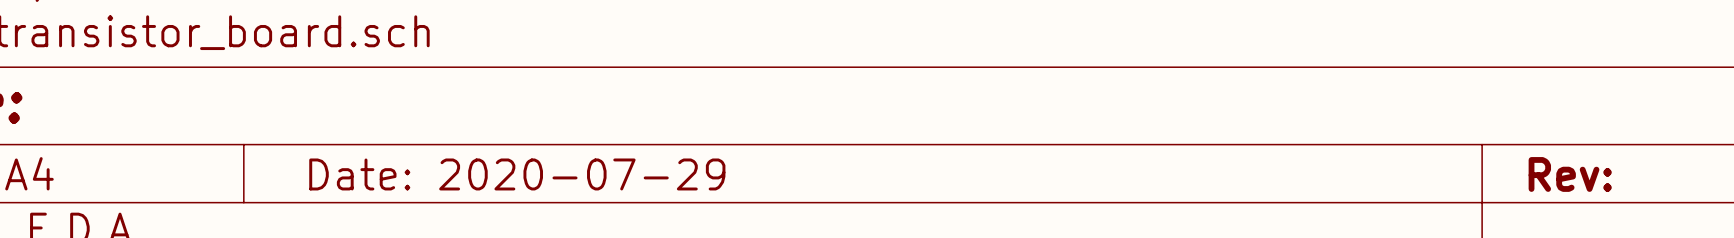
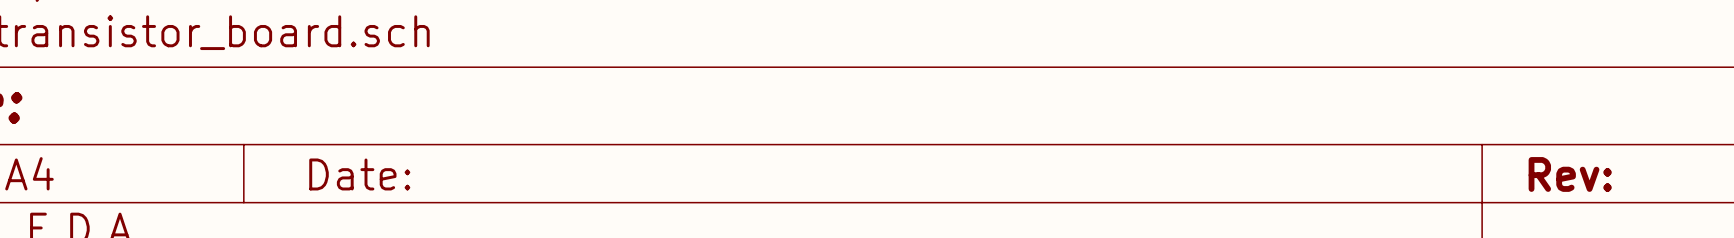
title block: Date: 2020-07-29 (517, 174) -> Date: (359, 174)

